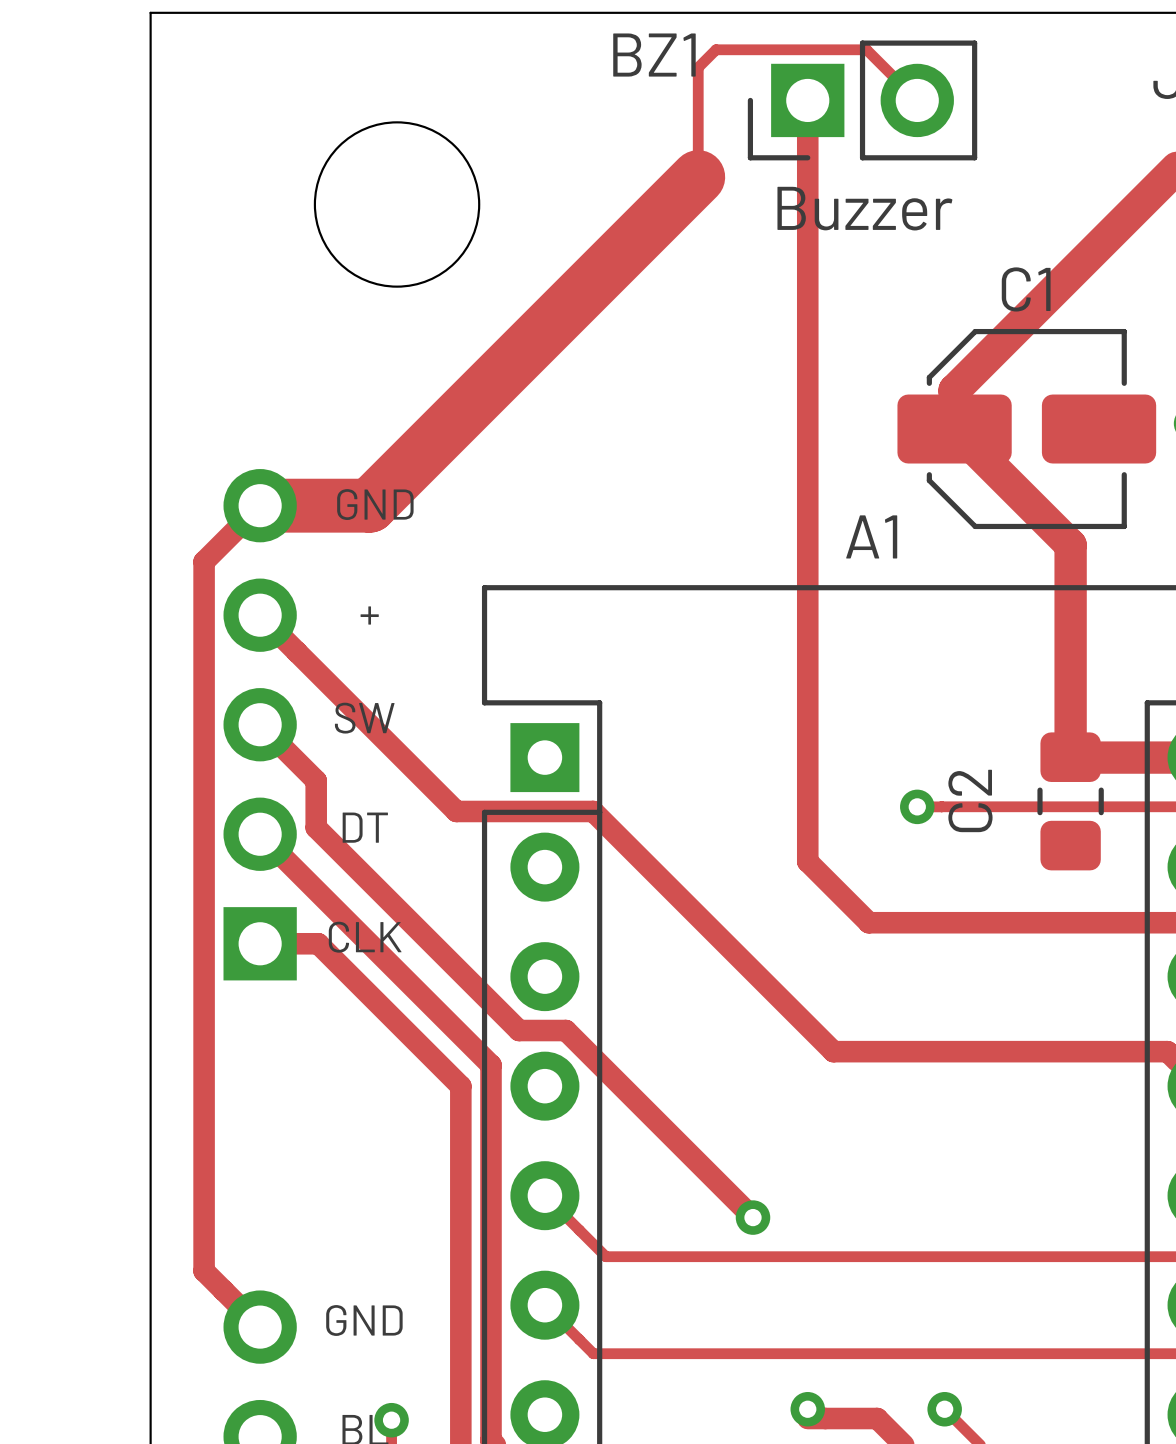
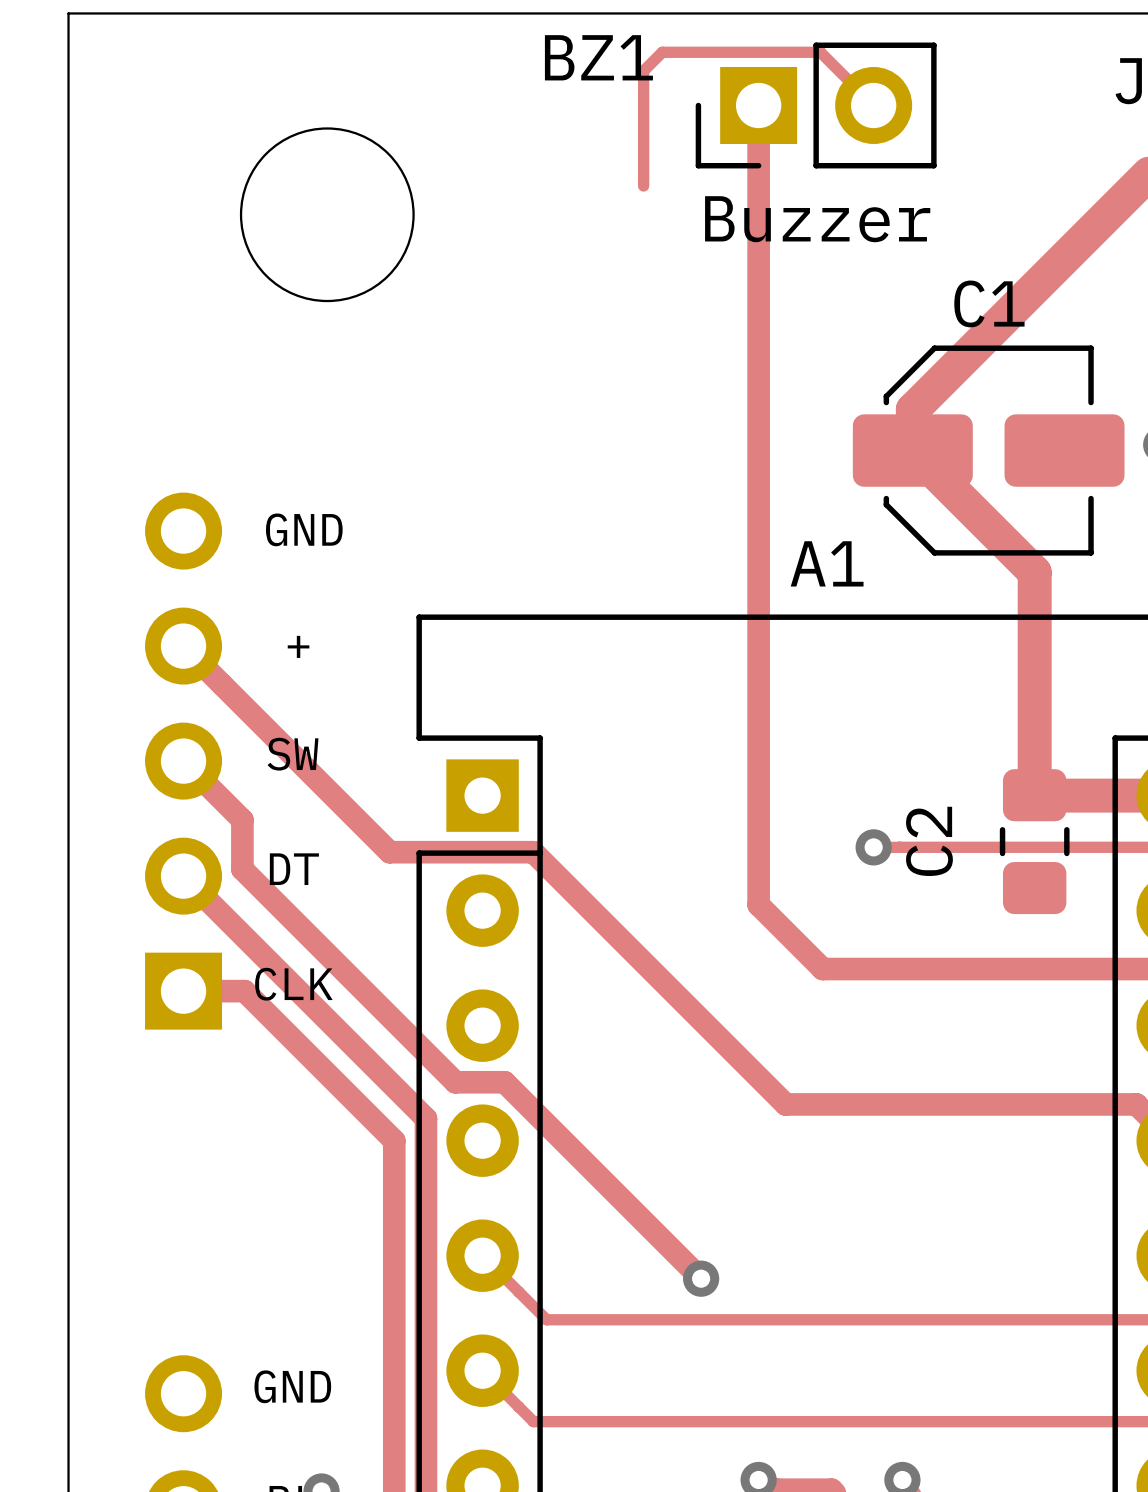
track: (698, 177) (369, 505) (260, 505) (204, 561) (204, 1271) (260, 1327) -> none

